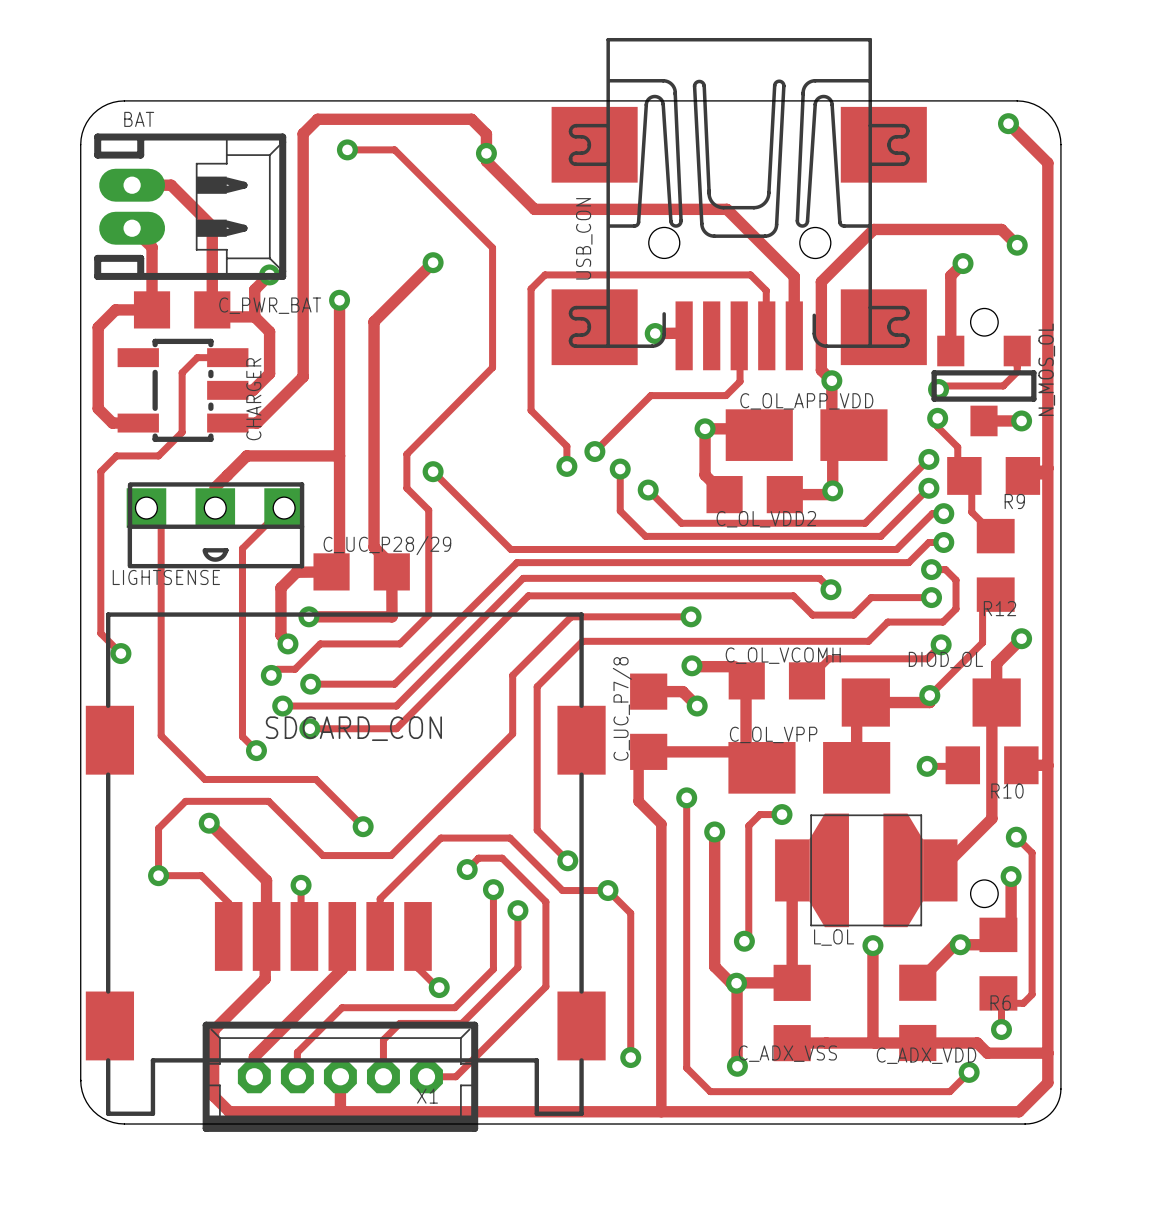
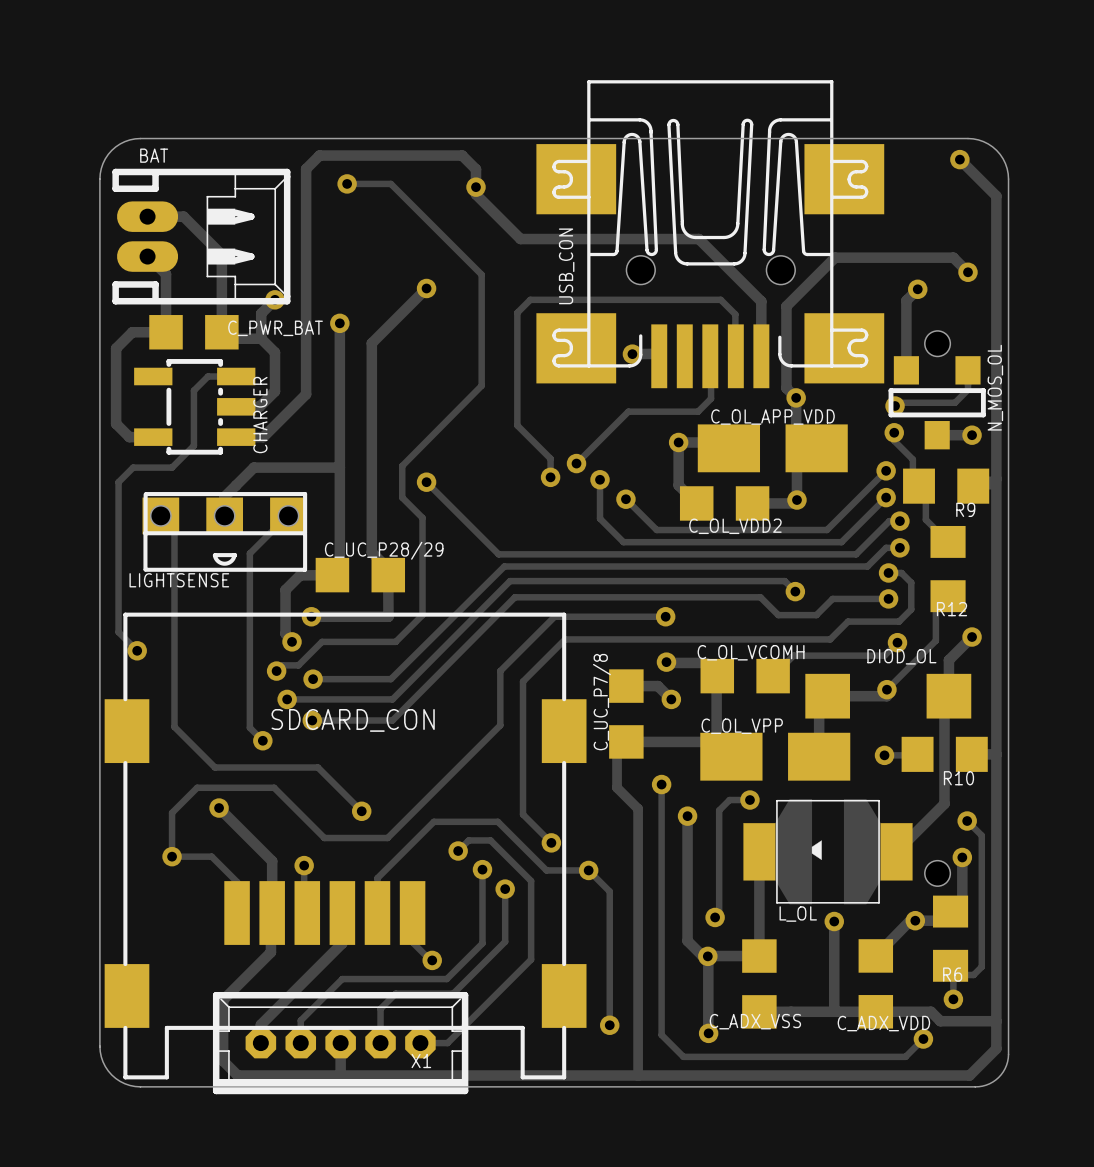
part footprint: [774, 813, 958, 928] -> [743, 799, 913, 905]

